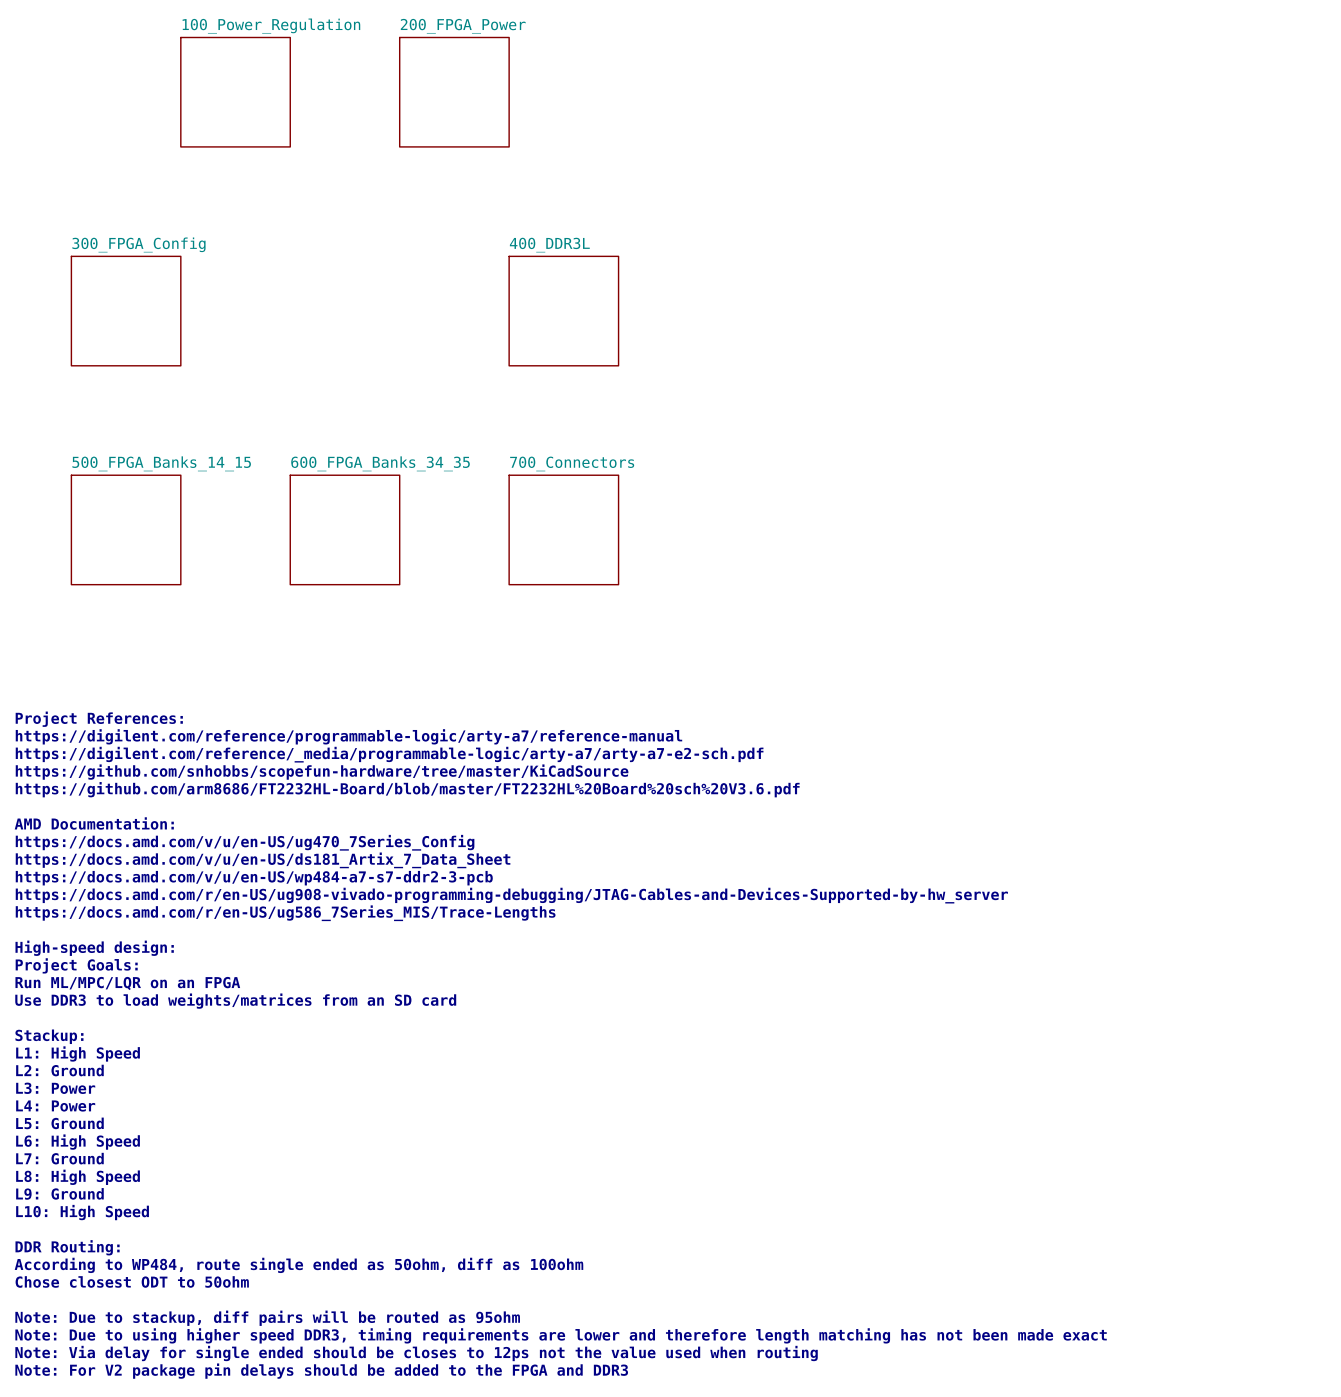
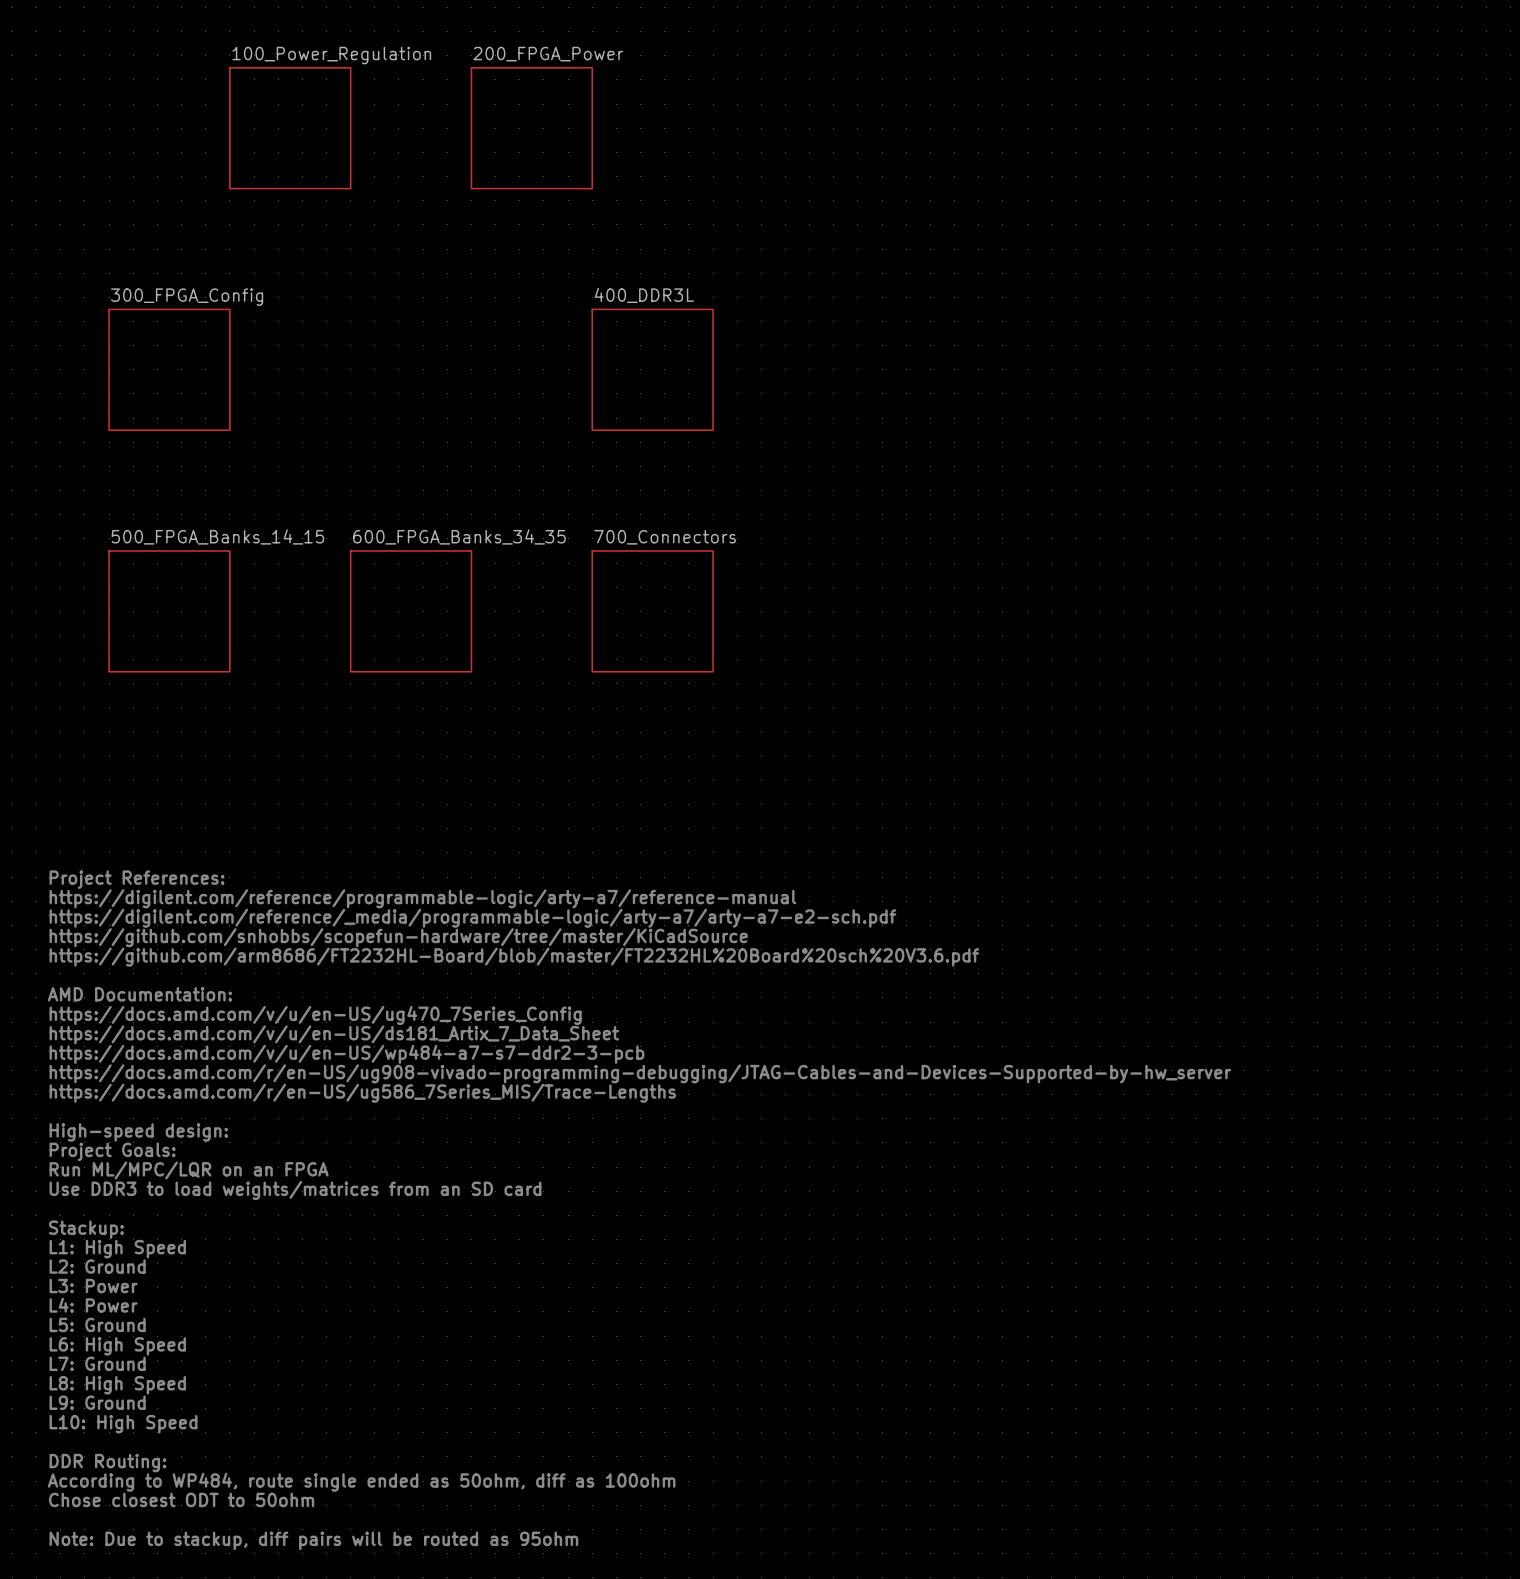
text: Project References: (99, 719) -> none
text: https://digilent.com/reference/programmable-logic/arty-a7/reference-manual (348, 736) -> none
text position: https://digilent.com/reference/_media/programmable-logic/arty-a7/arty-a7-e2-sch.pdf (389, 754) -> https://digilent.com/reference/_media/programmable-logic/arty-a7/arty-a7-e2-sch.pdf (472, 918)
text: https://github.com/snhobbs/scopefun-hardware/tree/master/KiCadSource (322, 772) -> Project References: (137, 879)
text: https://github.com/arm8686/FT2232HL-Board/blob/master/FT2232HL%20Board%20sch%20V3.6.pdf (407, 789) -> https://digilent.com/reference/programmable-logic/arty-a7/reference-manual (422, 898)
text: AMD Documentation: (94, 823) -> https://github.com/snhobbs/scopefun-hardware/tree/master/KiCadSource (398, 937)
text: https://docs.amd.com/v/u/en-US/ug470_7Series_Config (245, 842) -> https://github.com/arm8686/FT2232HL-Board/blob/master/FT2232HL%20Board%20sch%20V3.6.pdf (514, 957)
text: https://docs.amd.com/v/u/en-US/ds181_Artix_7_Data_Sheet (263, 860) -> none
text: https://docs.amd.com/v/u/en-US/wp484-a7-s7-ddr2-3-pcb (254, 878) -> AMD Documentation: (139, 994)
text: https://docs.amd.com/r/en-US/ug908-vivado-programming-debugging/JTAG-Cables-and-Devices-Supported-by-hw_server (511, 895) -> https://docs.amd.com/v/u/en-US/ug470_7Series_Config (315, 1015)
text: https://docs.amd.com/r/en-US/ug586_7Series_MIS/Trace-Lengths (285, 913) -> https://docs.amd.com/v/u/en-US/ds181_Artix_7_Data_Sheet (334, 1034)
text: none -> https://docs.amd.com/v/u/en-US/wp484-a7-s7-ddr2-3-pcb (346, 1054)
text: High-speed design: (94, 948) -> https://docs.amd.com/r/en-US/ug908-vivado-programming-debugging/JTAG-Cables-and-Devices-Supported-by-hw_server (640, 1073)
text: Project Goals: (76, 965) -> https://docs.amd.com/r/en-US/ug586_7Series_MIS/Trace-Lengths (362, 1093)
text: Run ML/MPC/LQR on an FPGA (127, 983) -> none
text: Use DDR3 to load weights/matrices from an SD card (235, 1001) -> High-speed design: (138, 1132)
text: none -> Project Goals: (112, 1151)
text: Stackup: (49, 1036) -> Run ML/MPC/LQR on an FPGA (189, 1170)
text: L1: High Speed (78, 1053) -> Use DDR3 to load weights/matrices from an SD card (295, 1190)
text: L2: Ground (59, 1070) -> none
text: L3: Power (55, 1088) -> Stackup: (86, 1229)
text: L4: Power (55, 1106) -> L1: High Speed (117, 1249)
text: L5: Ground (59, 1123) -> L2: Ground (97, 1266)
text: L6: High Speed (78, 1142) -> L3: Power (93, 1286)
text: L7: Ground (59, 1158) -> L4: Power (93, 1305)
text: L8: High Speed (78, 1177) -> L5: Ground (97, 1324)
text: L9: Ground (59, 1193) -> L6: High Speed (117, 1346)
text: L10: High Speed (82, 1212) -> L7: Ground (97, 1363)
text: none -> L8: High Speed (117, 1385)
text: DDR Routing: (67, 1247) -> L9: Ground (97, 1402)
text: According to WP484, route single ended as 50ohm, diff as 100ohm (298, 1265) -> L10: High Speed (123, 1424)
text: Chose closest ODT to 50ohm (132, 1281) -> none
text: none -> DDR Routing: (107, 1463)
text: Note: Due to stackup, diff pairs will be routed as 95ohm (267, 1318) -> According to WP484, route single ended as 50ohm, diff as 100ohm (361, 1482)
text: Note: Due to using higher speed DDR3, timing requirements are lower and therefore length matching has not been made exact (561, 1335) -> Chose closest ODT to 50ohm (181, 1499)
text: Note: Via delay for single ended should be closes to 12ps not the value used when routing (416, 1353) -> none
text: Note: For V2 package pin delays should be added to the FPGA and DDR3 (321, 1371) -> Note: Due to stackup, diff pairs will be routed as 95ohm (313, 1540)

